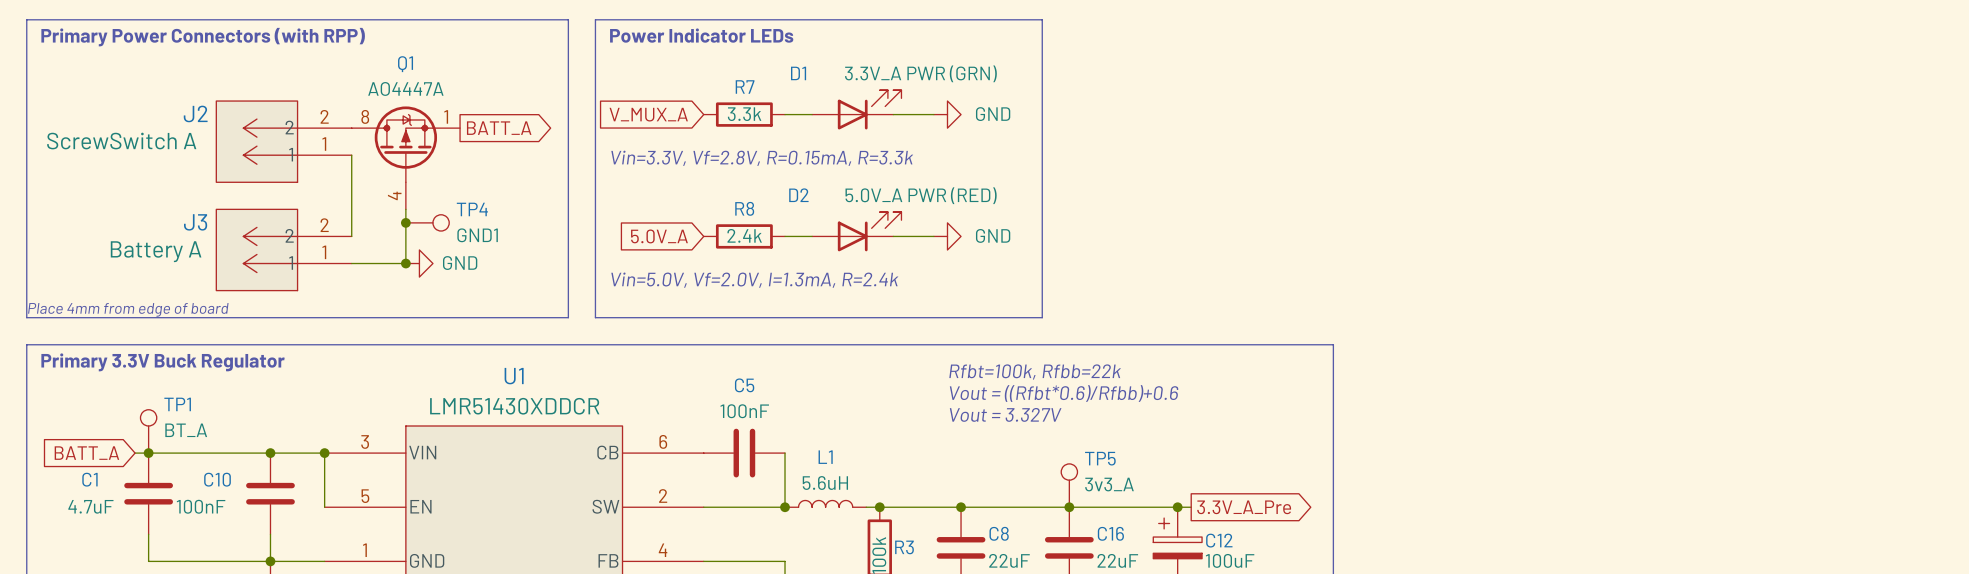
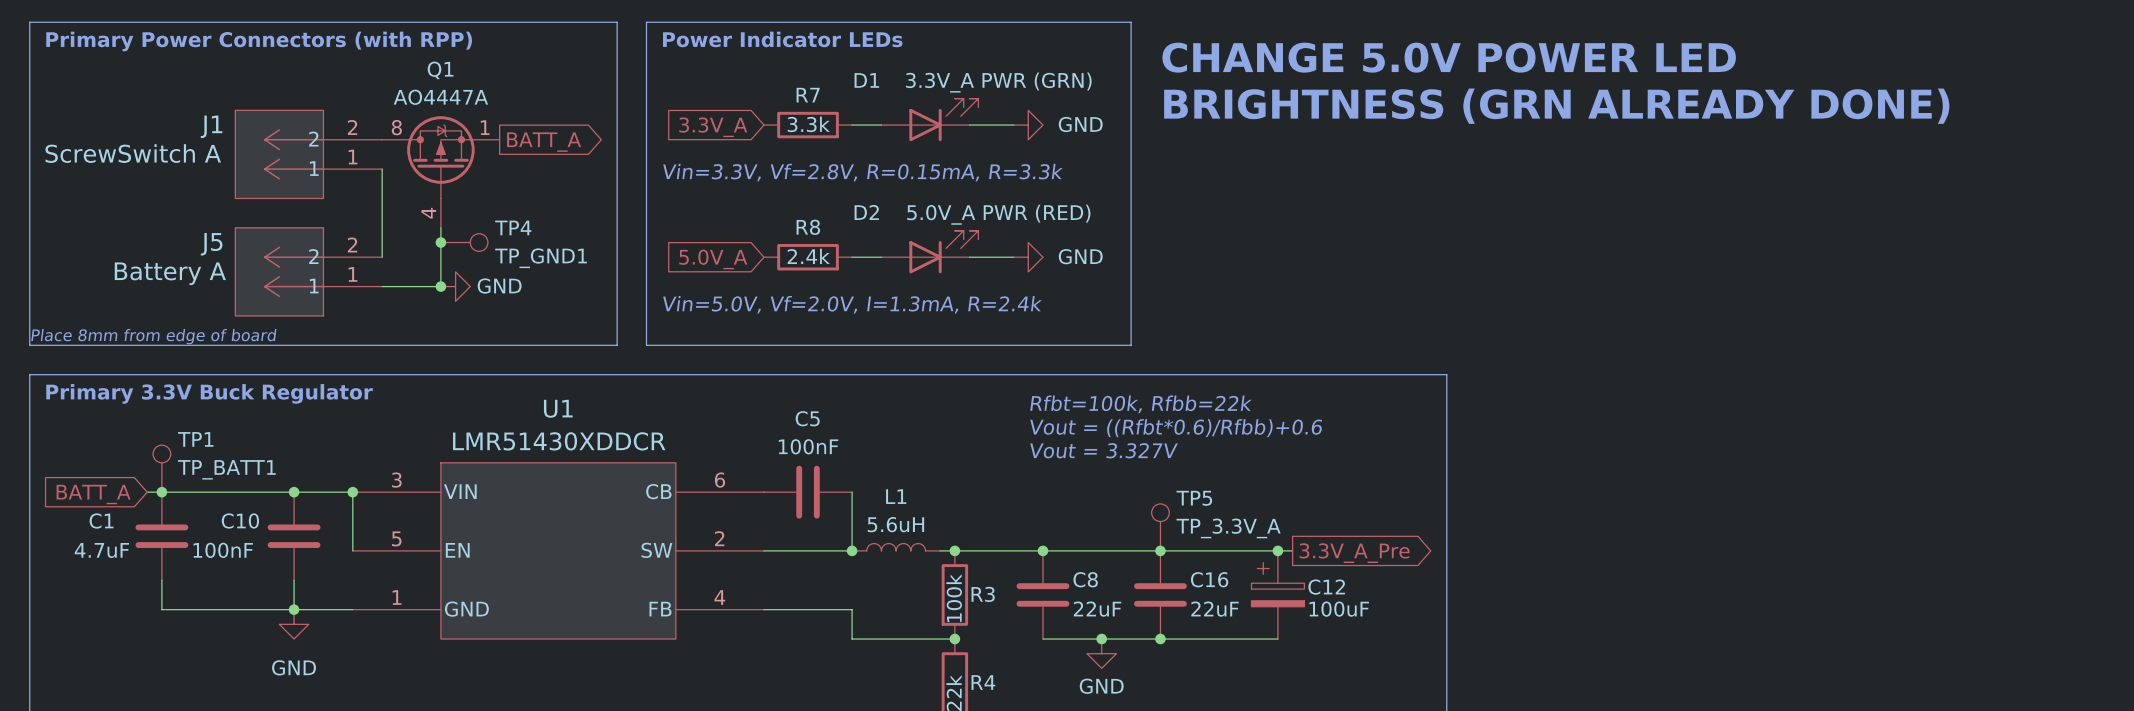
text: none -> CHANGE 5.0V POWER LED (1449, 57)
text: none -> BRIGHTNESS (GRN ALREADY DONE) (1556, 106)
J2 name: J2 (195, 113) -> J1 (211, 126)
global label: V_MUX_A (648, 114) -> 3.3V_A (713, 127)
J3 name: J3 (195, 222) -> J5 (211, 244)
TP4 value: GND1 (477, 235) -> TP_GND1 (541, 258)
text: Place 4mm from edge of board (128, 309) -> Place 8mm from edge of board (153, 336)
TP1 value: BT_A (186, 430) -> TP_BATT1 (226, 469)
TP5 value: 3v3_A (1109, 484) -> TP_3.3V_A (1228, 528)

